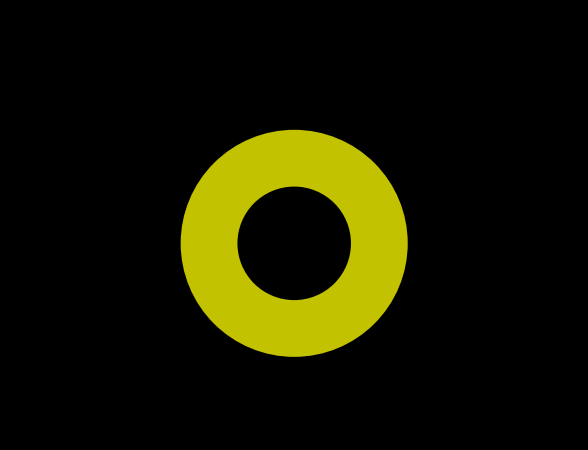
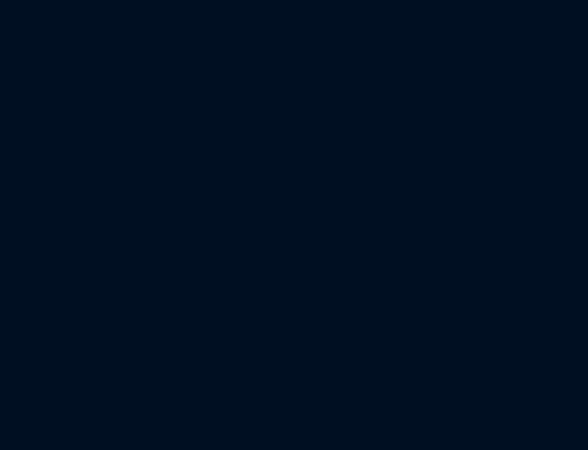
part: (294, 243) -> none

